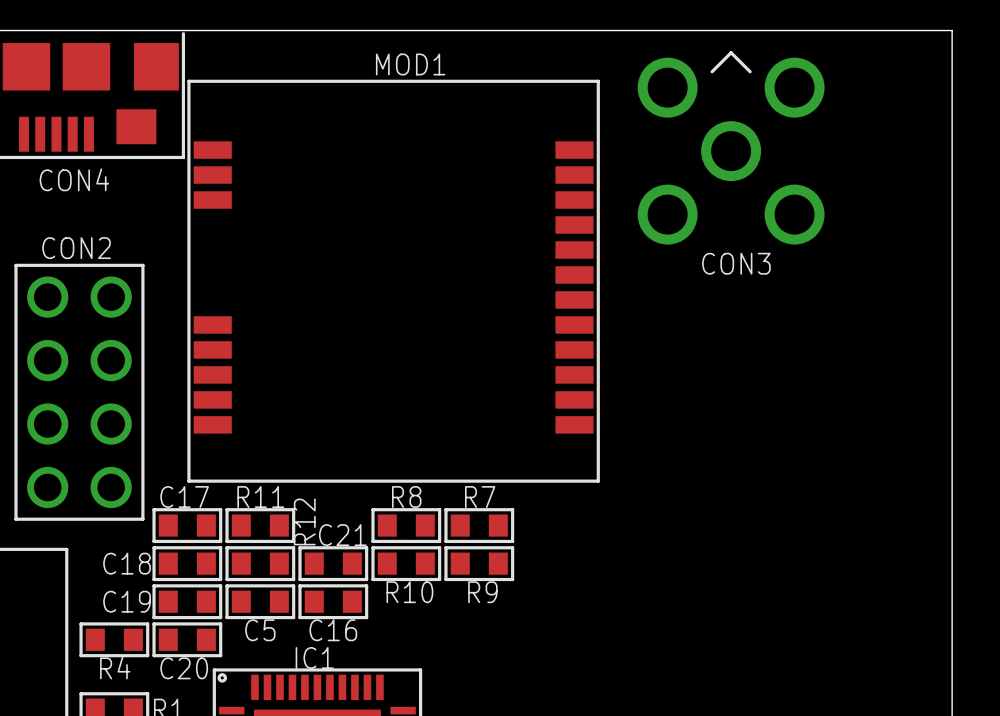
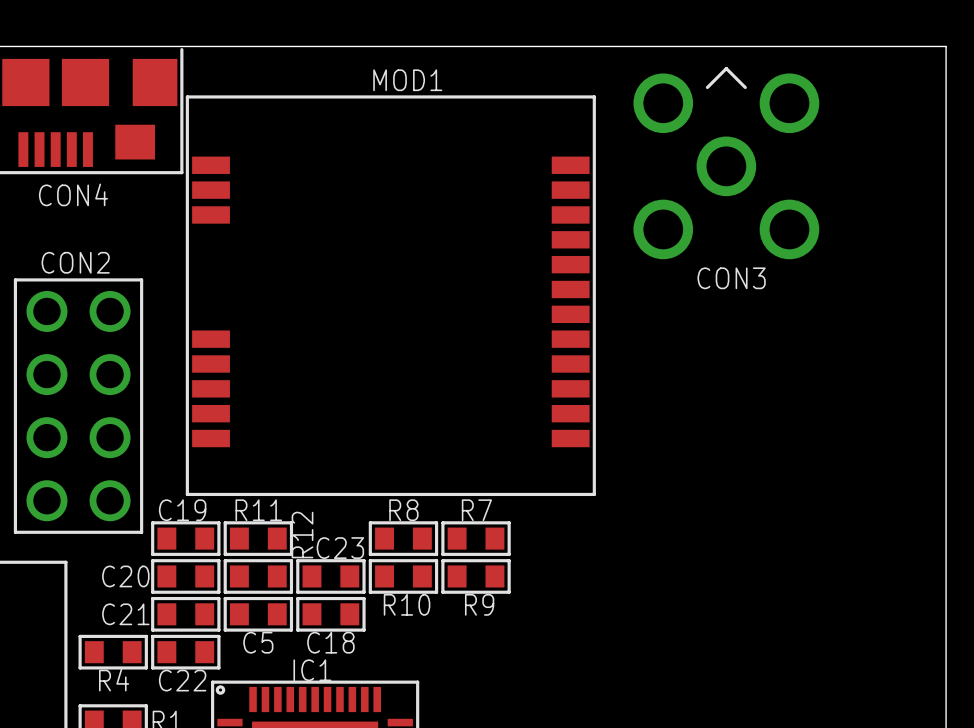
C17 name: C17 (184, 497) -> C19 (182, 510)
C21 name: C21 (342, 535) -> C23 (340, 548)
C18 name: C18 (127, 563) -> C20 (125, 576)
C19 name: C19 (127, 601) -> C21 (125, 614)
C16 name: C16 (333, 630) -> C18 (330, 642)
C20 name: C20 (184, 668) -> C22 (182, 680)

